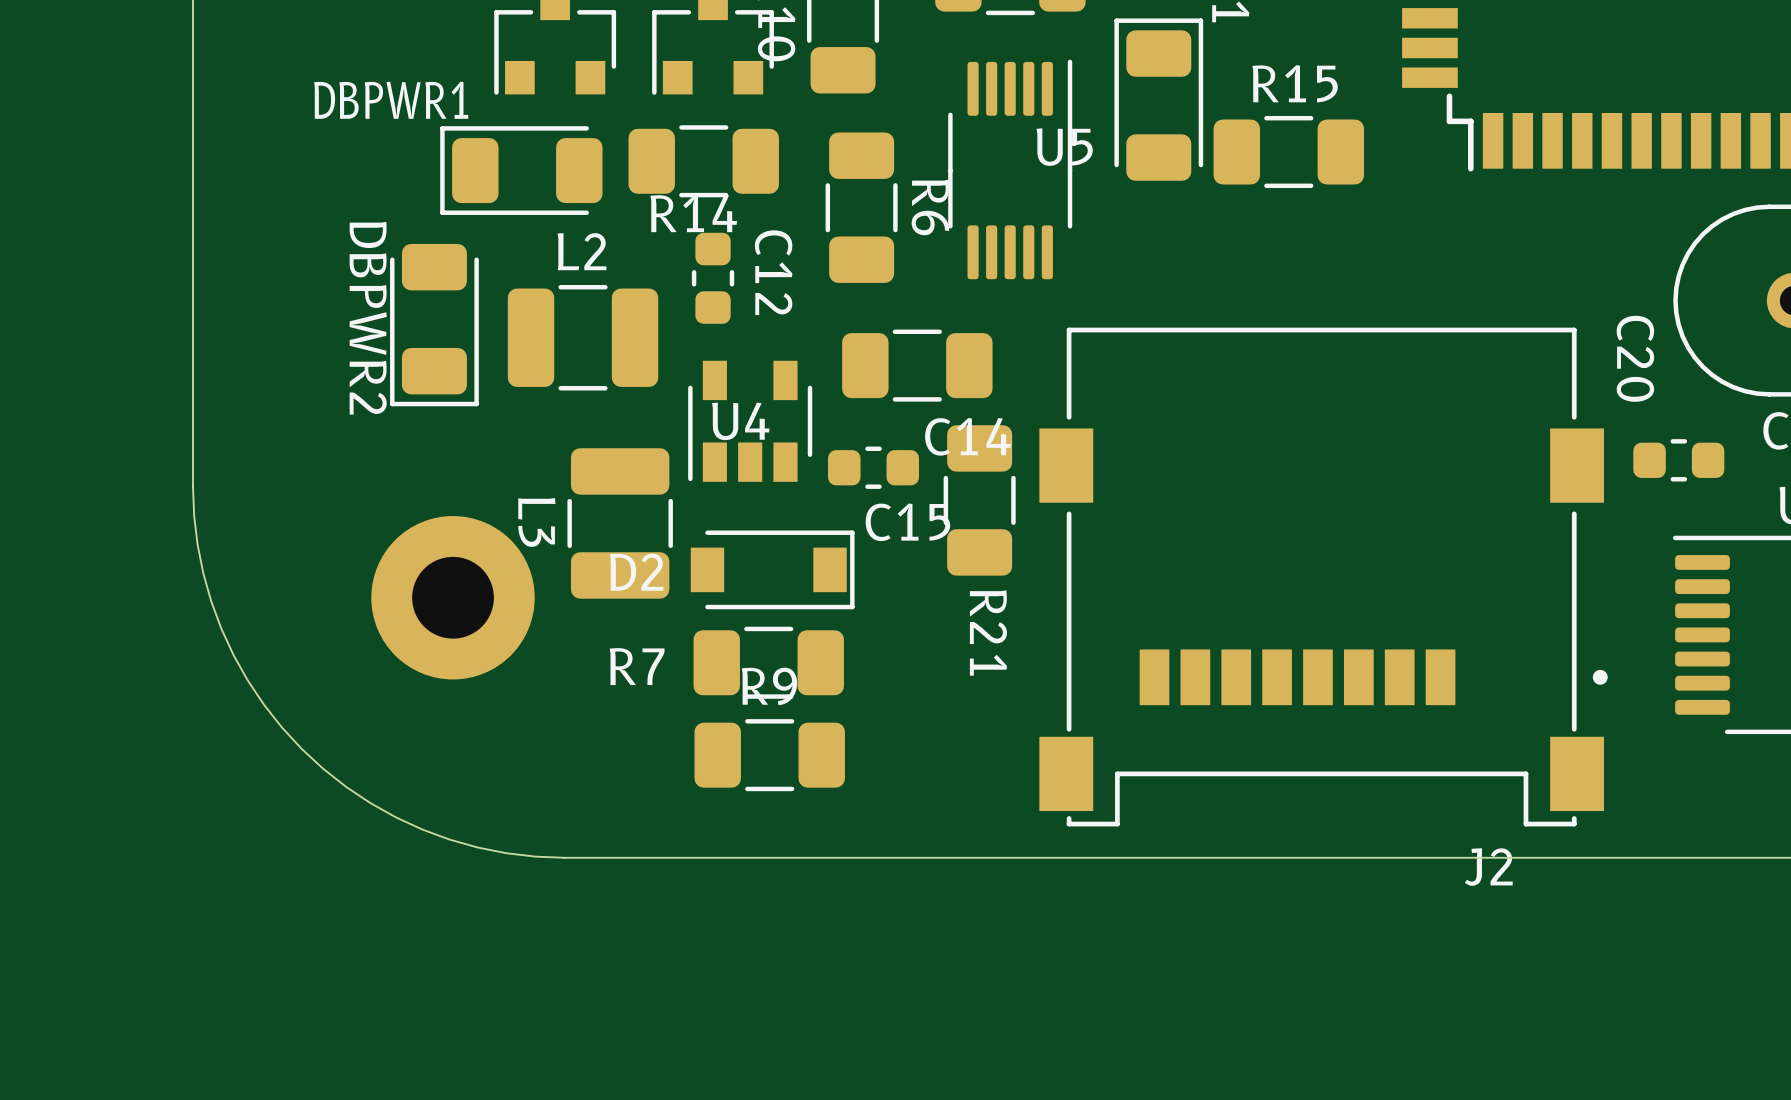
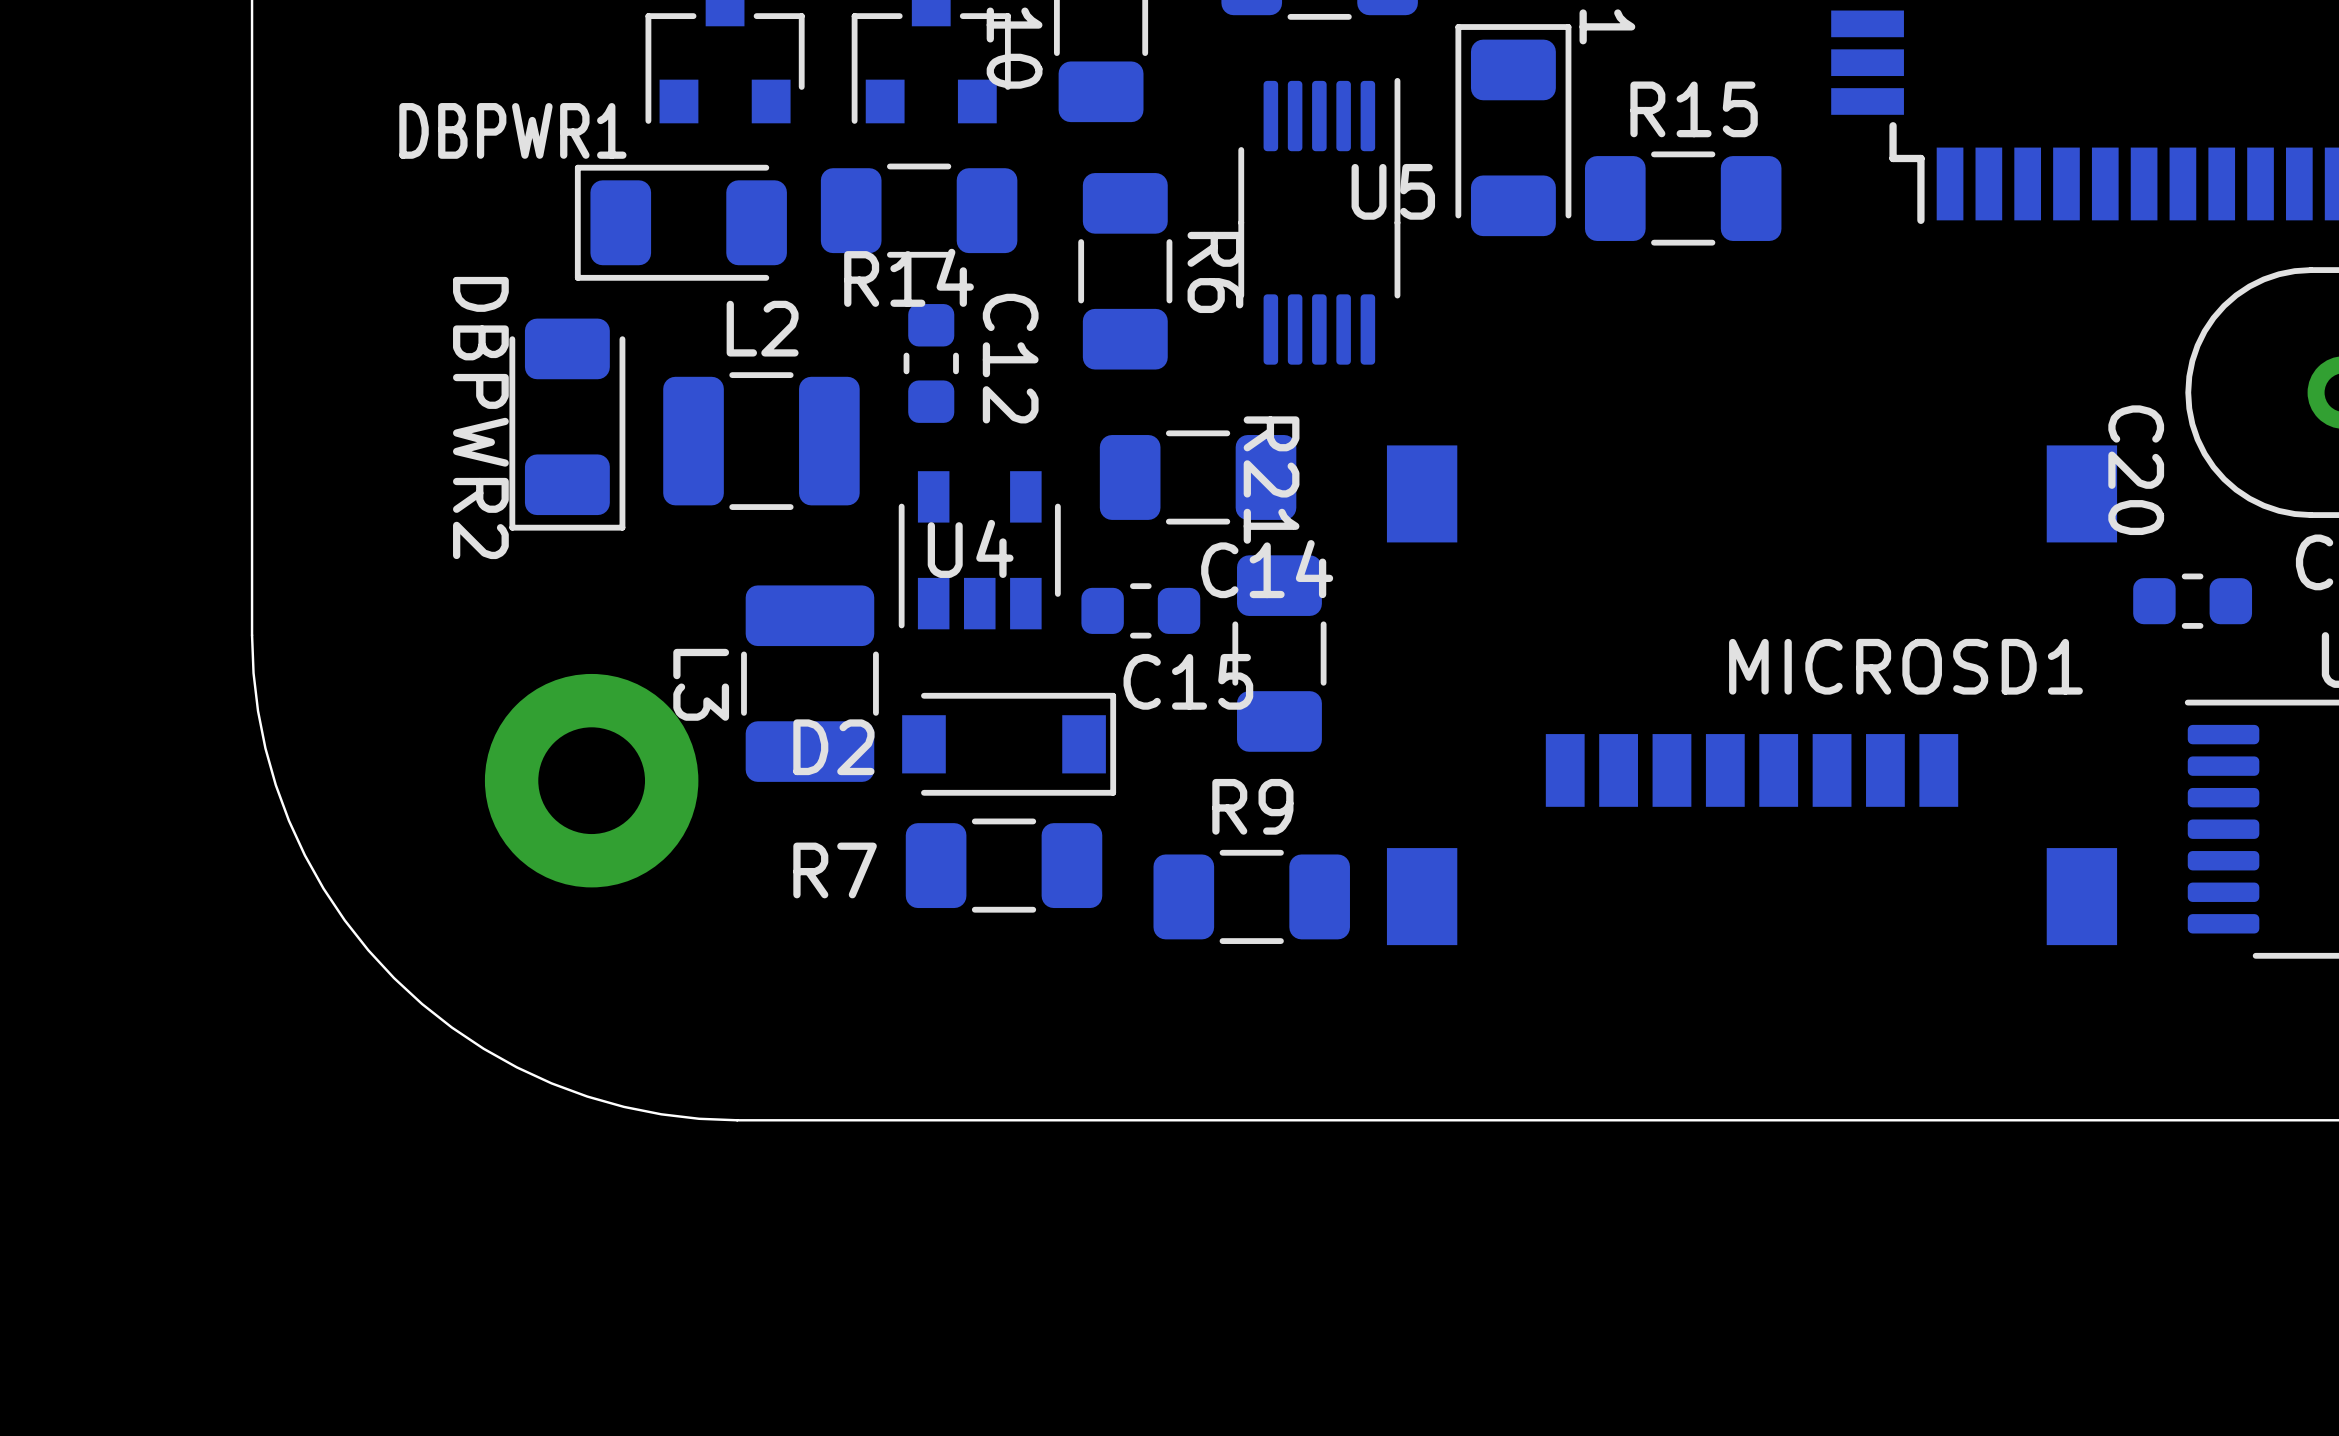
MICROSD1: none -> (1752, 695)
J2: (1323, 577) -> none
R21 name position: R21 (988, 632) -> R21 (1271, 480)
R9 position: (769, 755) -> (1251, 896)

